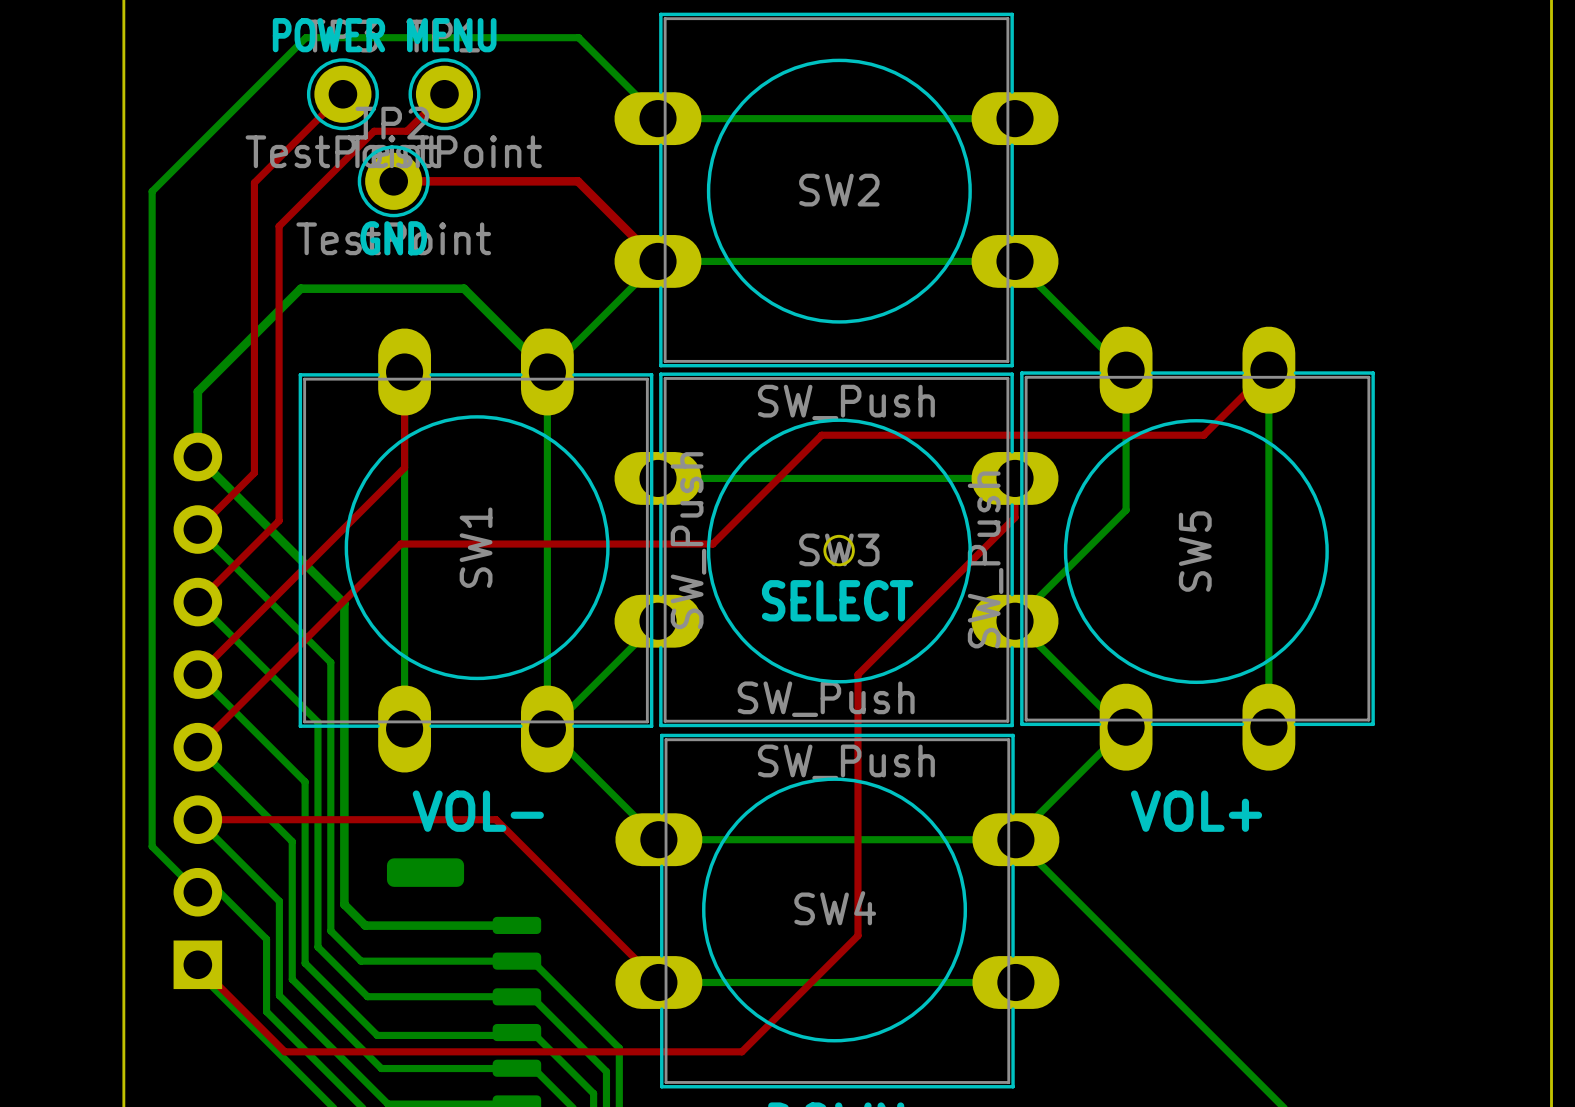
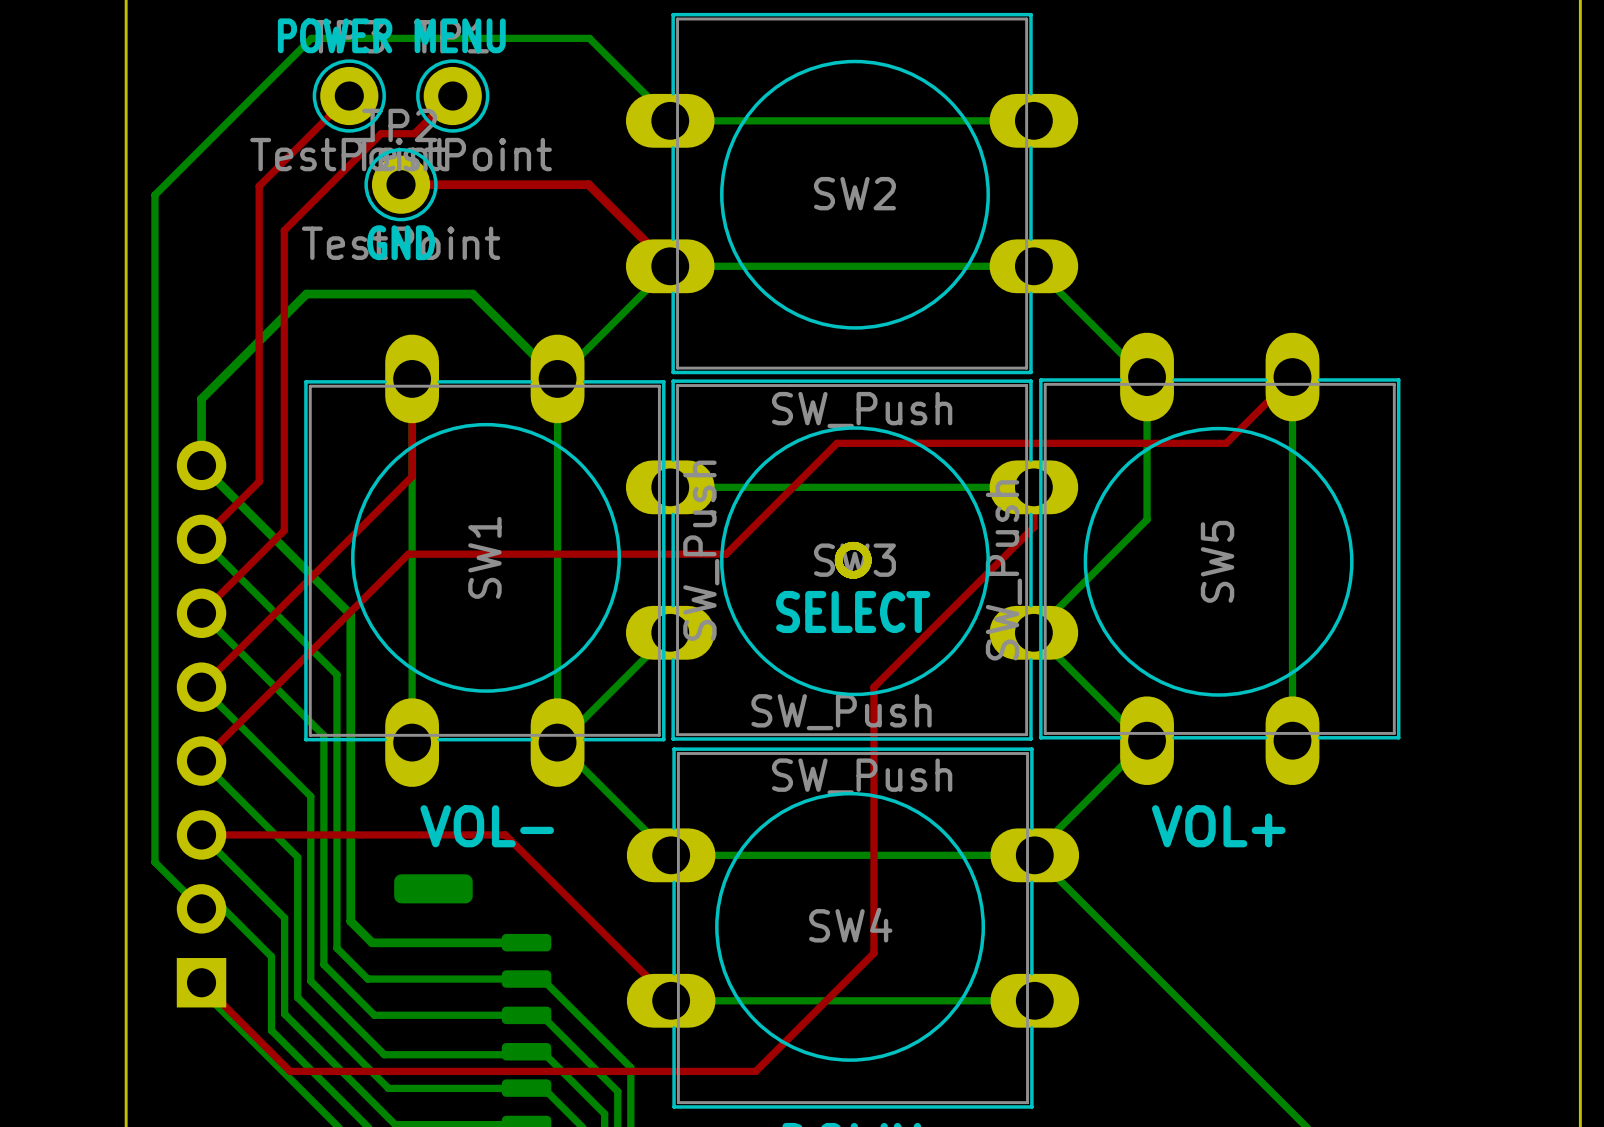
round board edge: [823, 534, 855, 567] -> none
board edge: none -> (851, 545) (862, 549) (867, 558) (864, 569) (854, 574) (843, 571) (838, 561) (841, 551) (851, 545)

